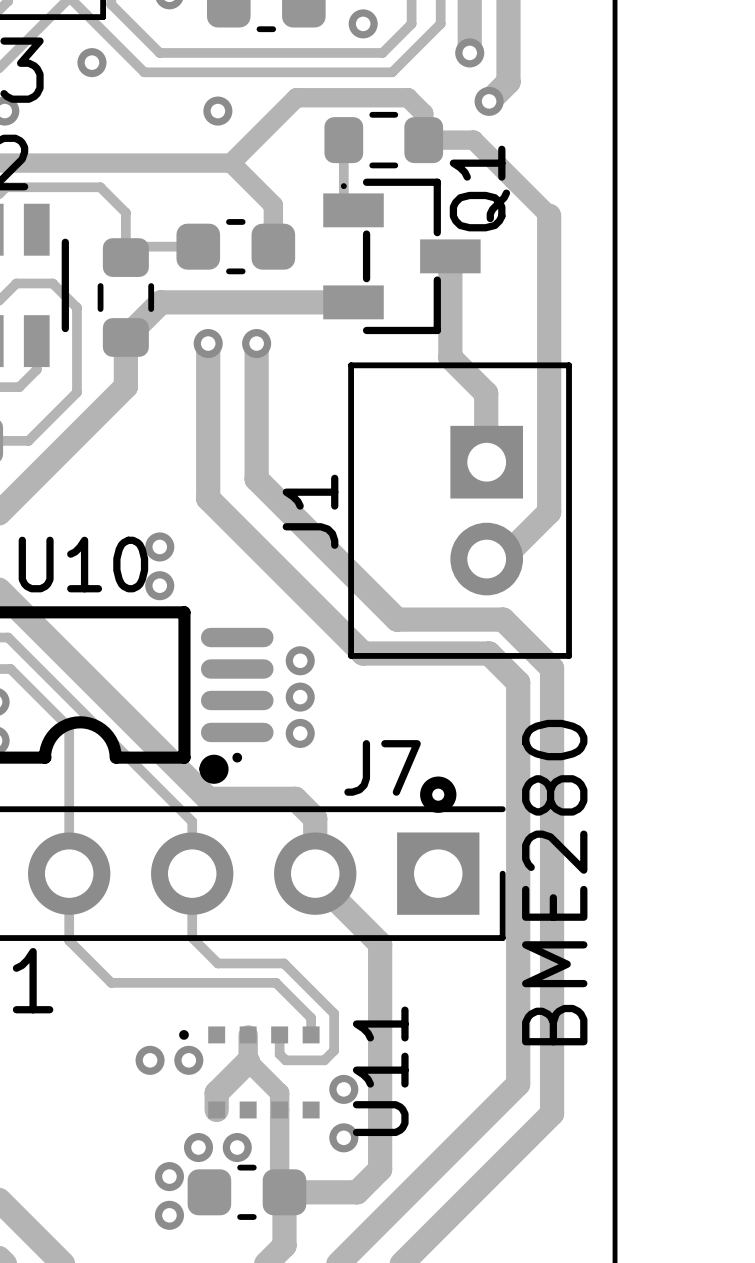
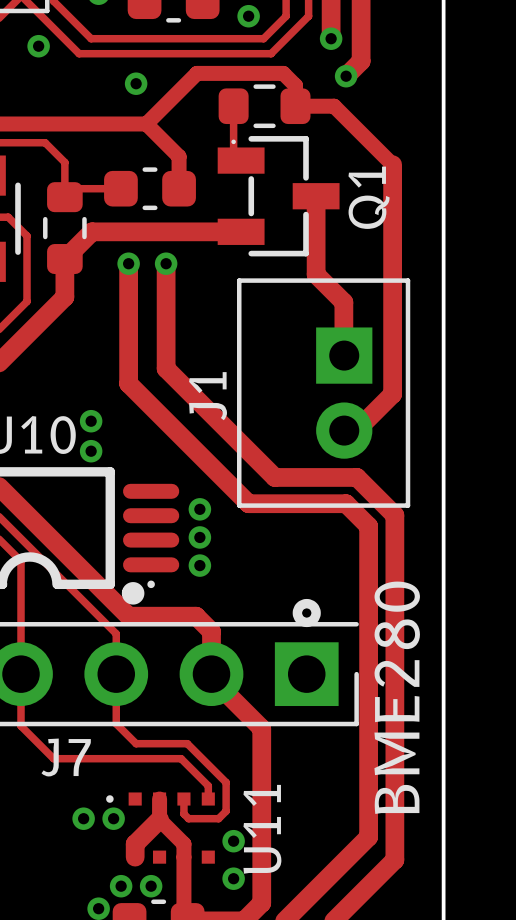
Q1 name position: Q1 (479, 188) -> Q1 (369, 197)
J7 name position: J7 (382, 767) -> J7 (66, 757)

